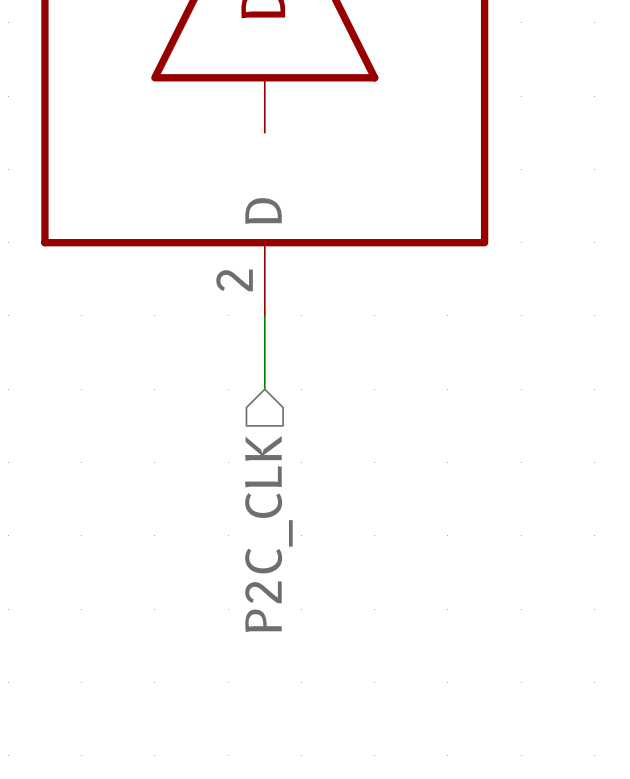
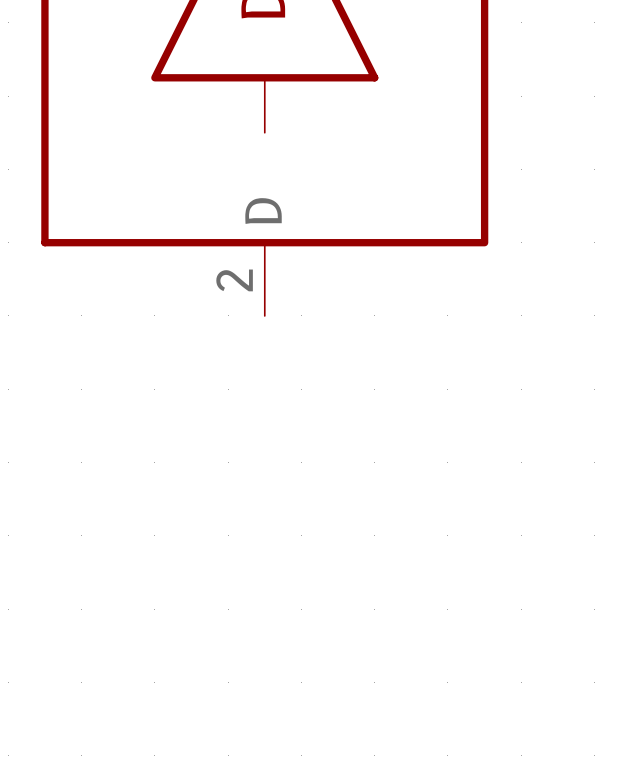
wire: (264, 315) (264, 389) -> none
hierarchical label: P2C_CLK (268, 534) -> none

